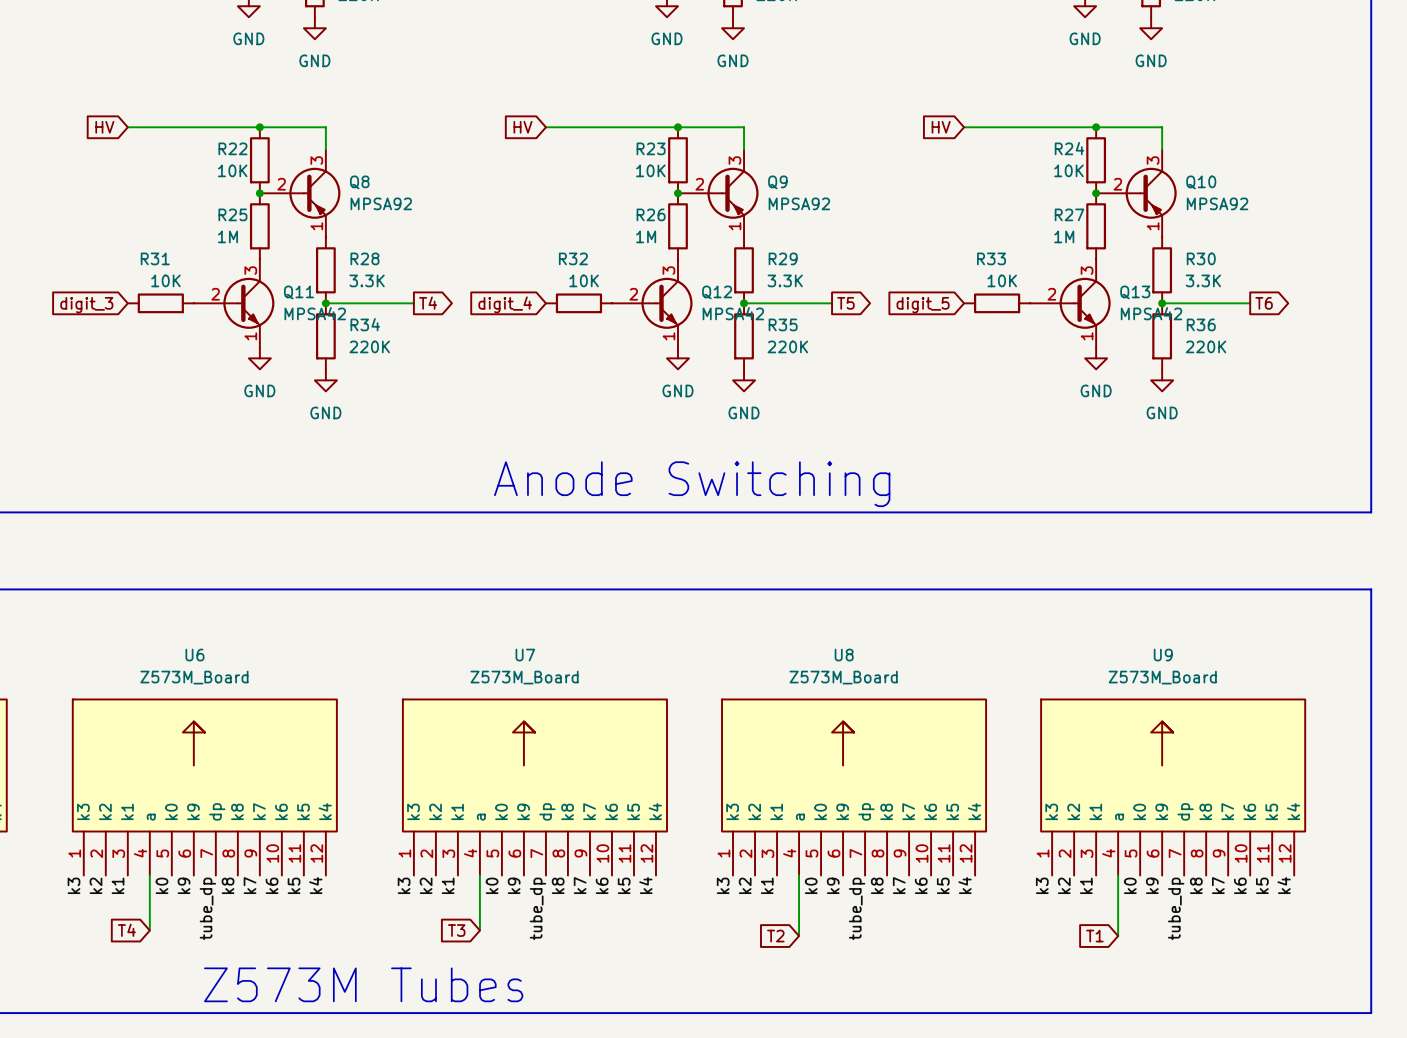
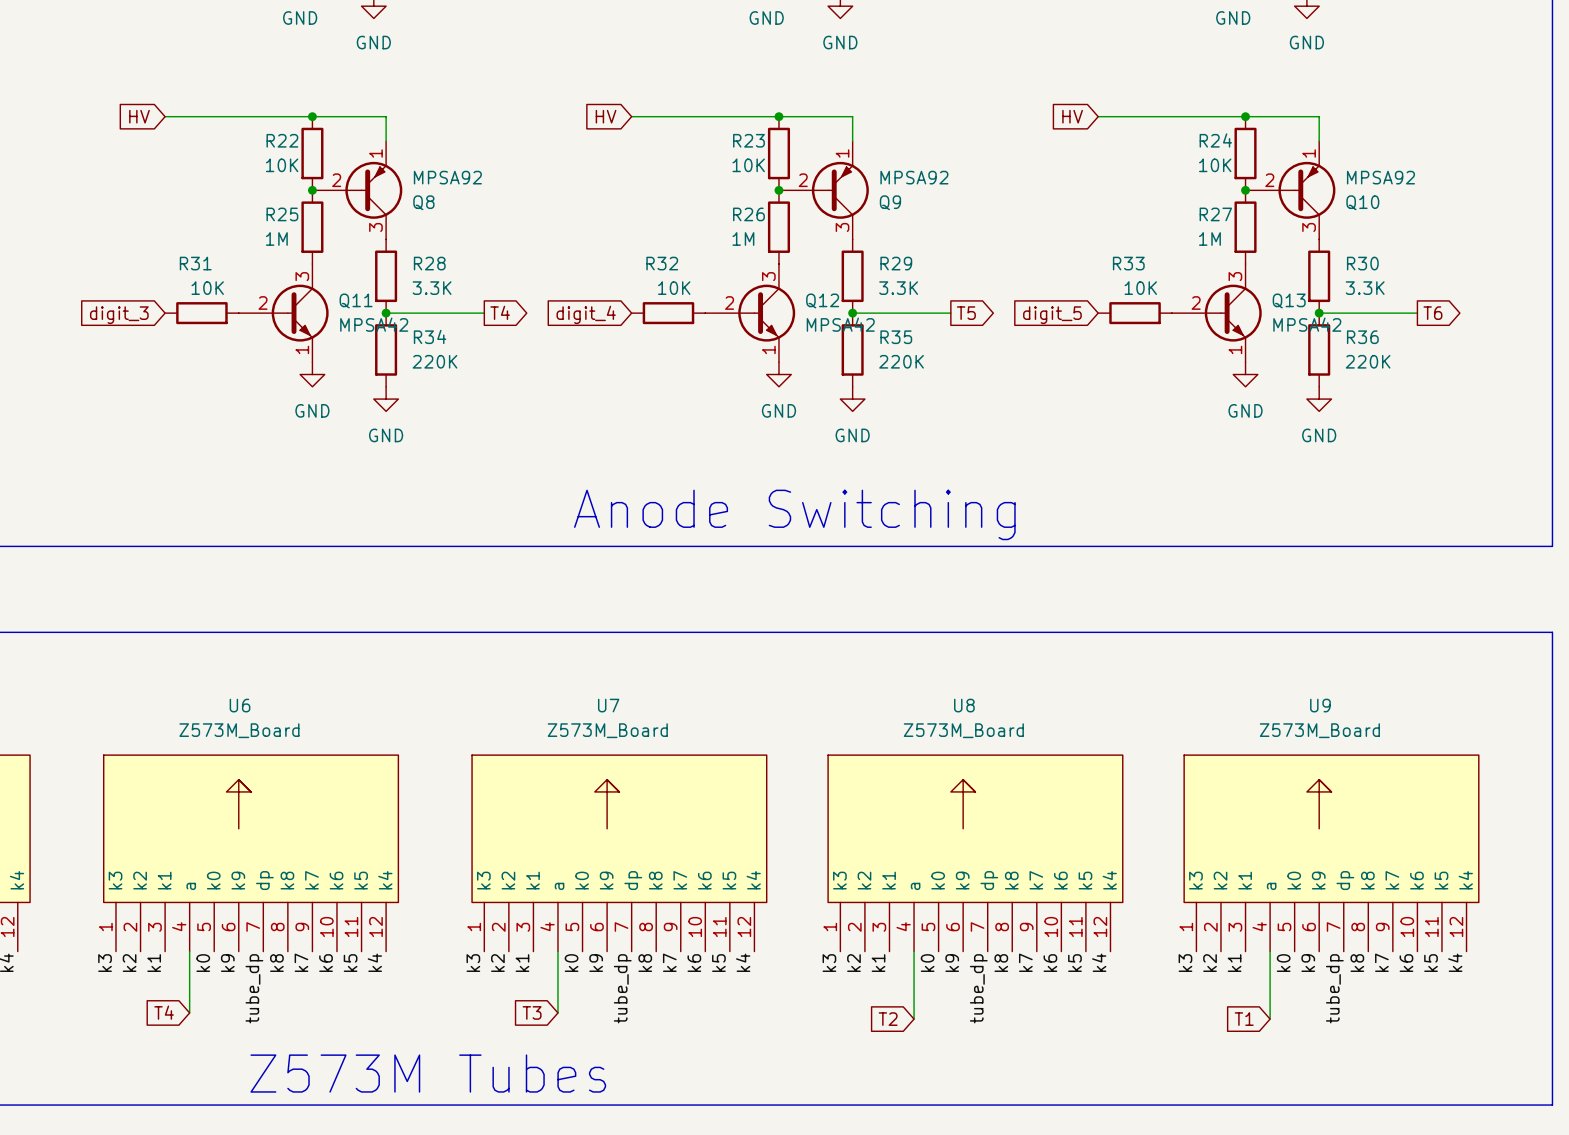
Q8 flip: as is (314, 193) -> up-down (373, 190)
Q9 flip: as is (733, 193) -> up-down (840, 190)
Q10 flip: as is (1151, 193) -> up-down (1306, 190)

